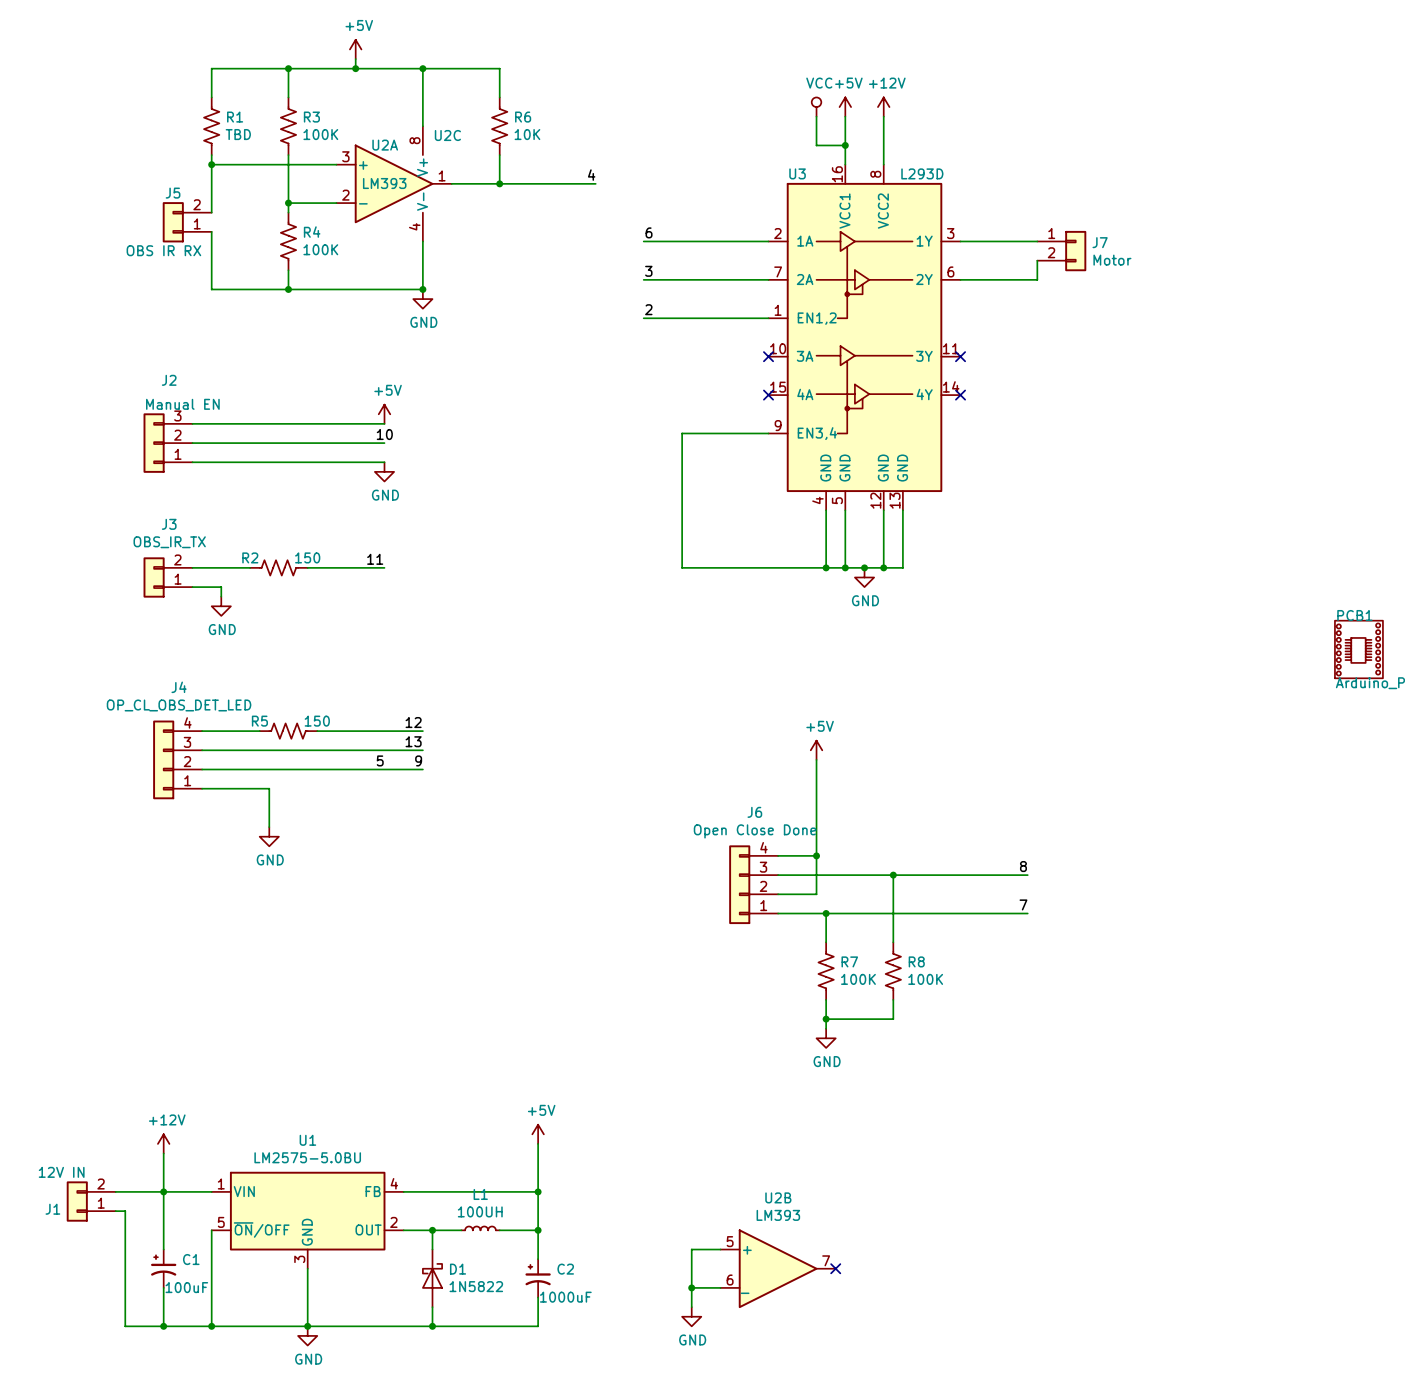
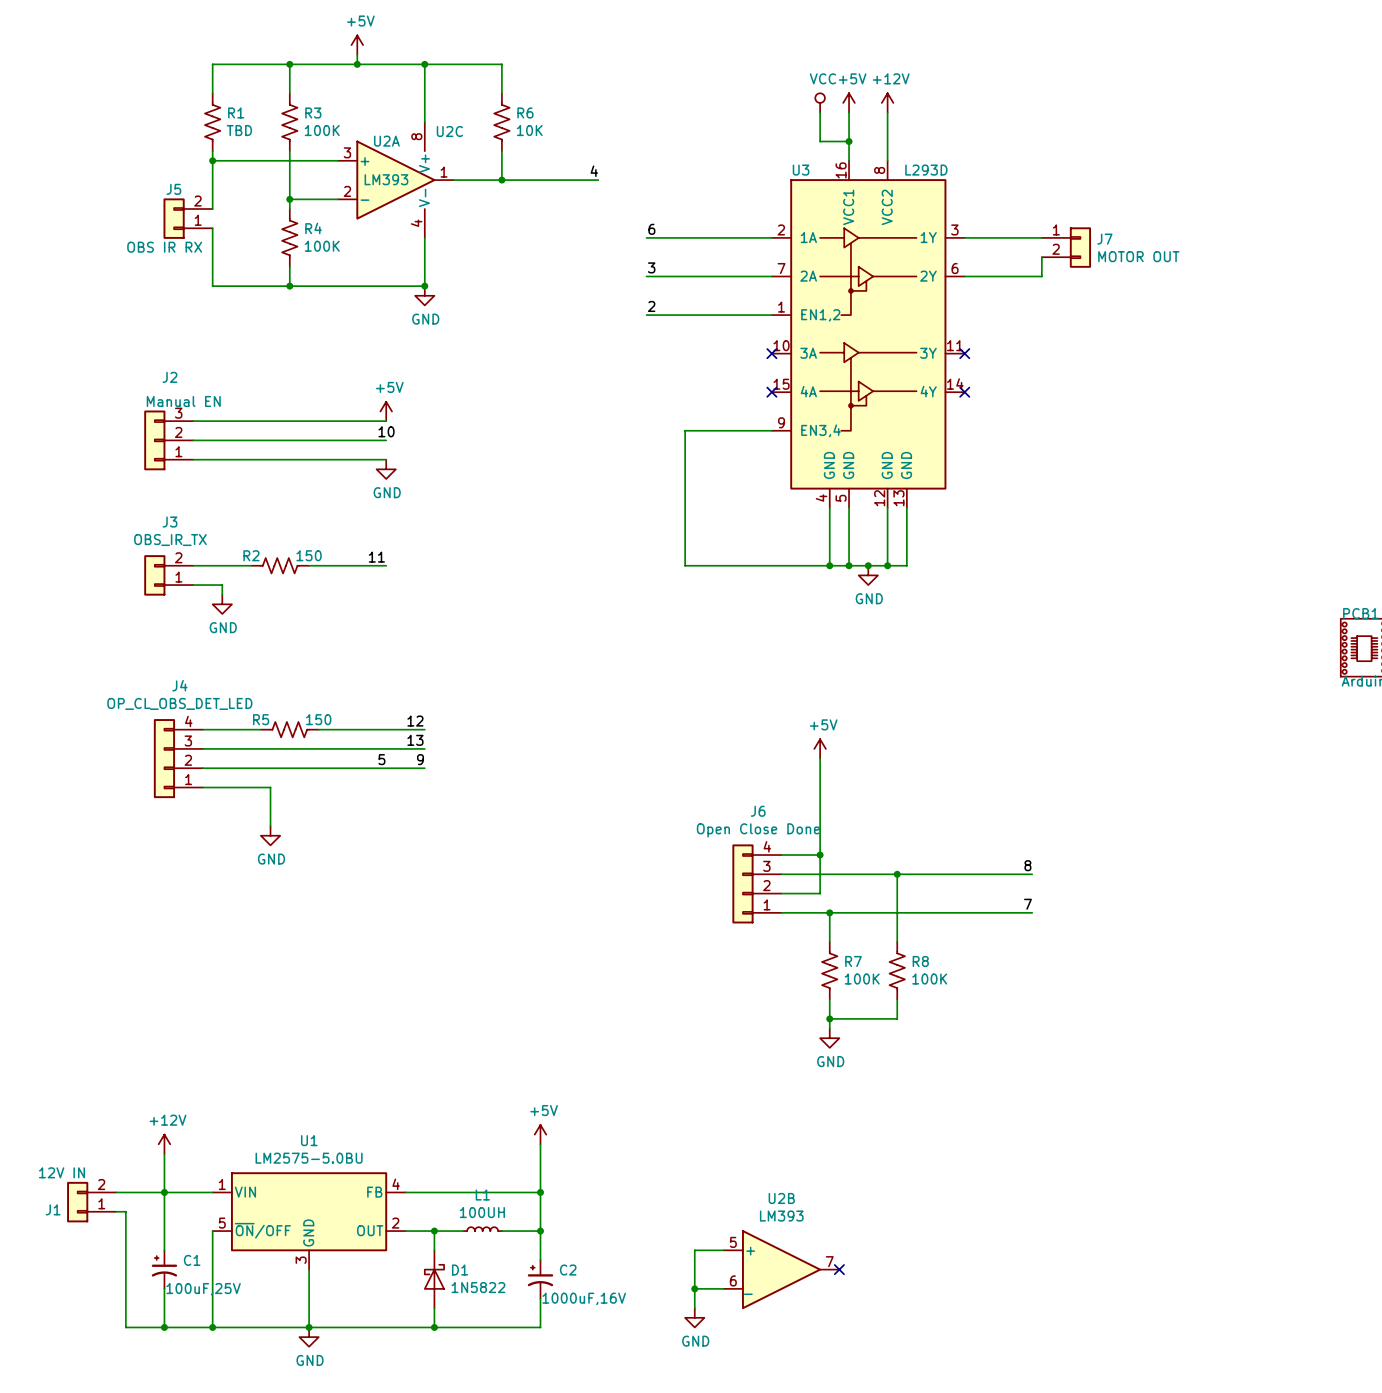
J7 value: Motor (1112, 260) -> MOTOR OUT (1138, 256)
C1 value: 100uF (186, 1287) -> 100uF,25V (203, 1289)
C2 value: 1000uF (565, 1297) -> 1000uF,16V (584, 1298)

